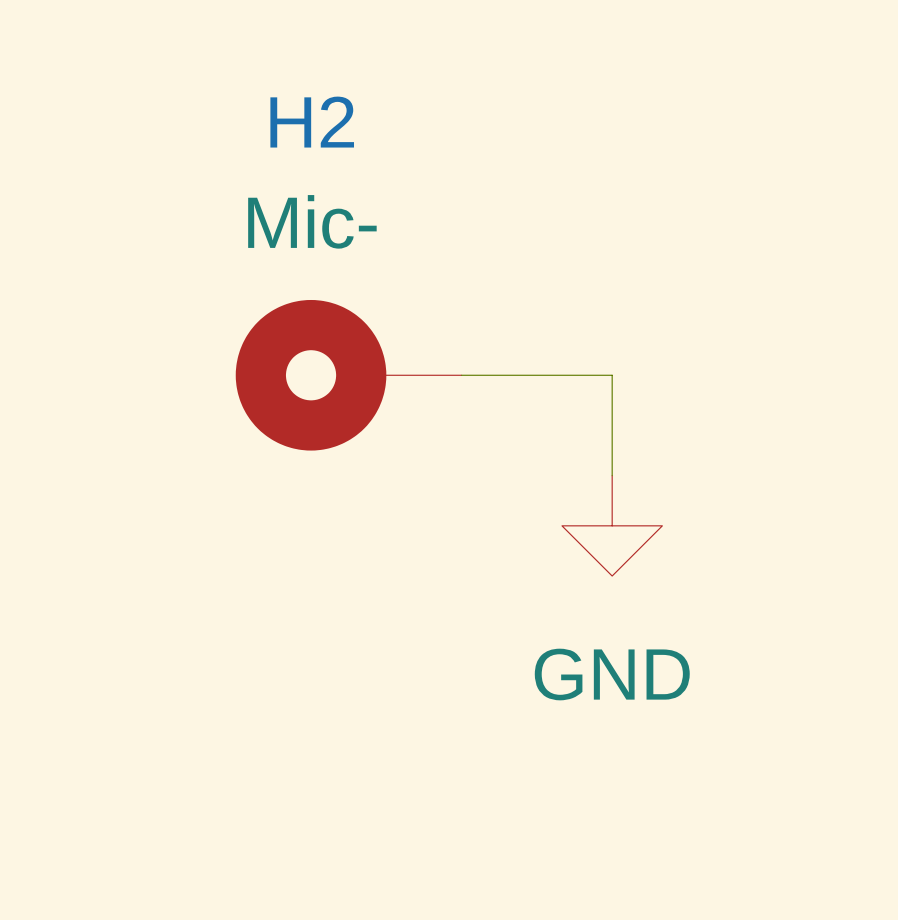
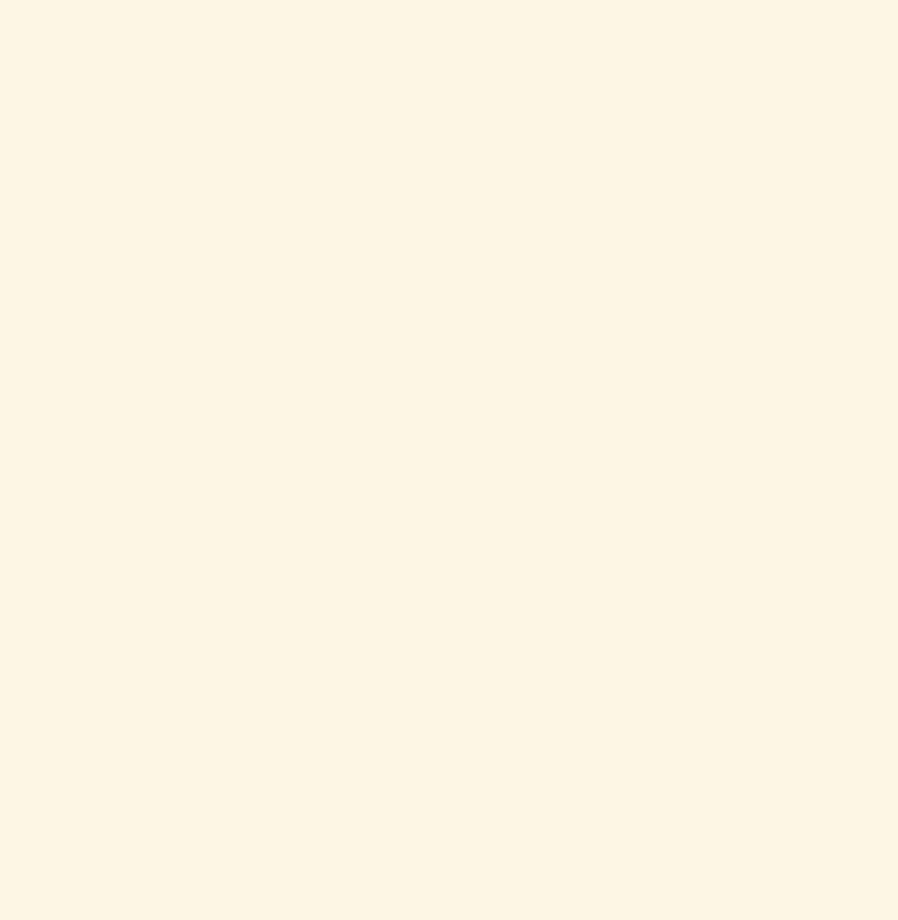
H2: Mic- (348, 375) -> none
wire: (461, 375) (612, 375) (612, 475) -> none
power symbol: GND (612, 525) -> none

